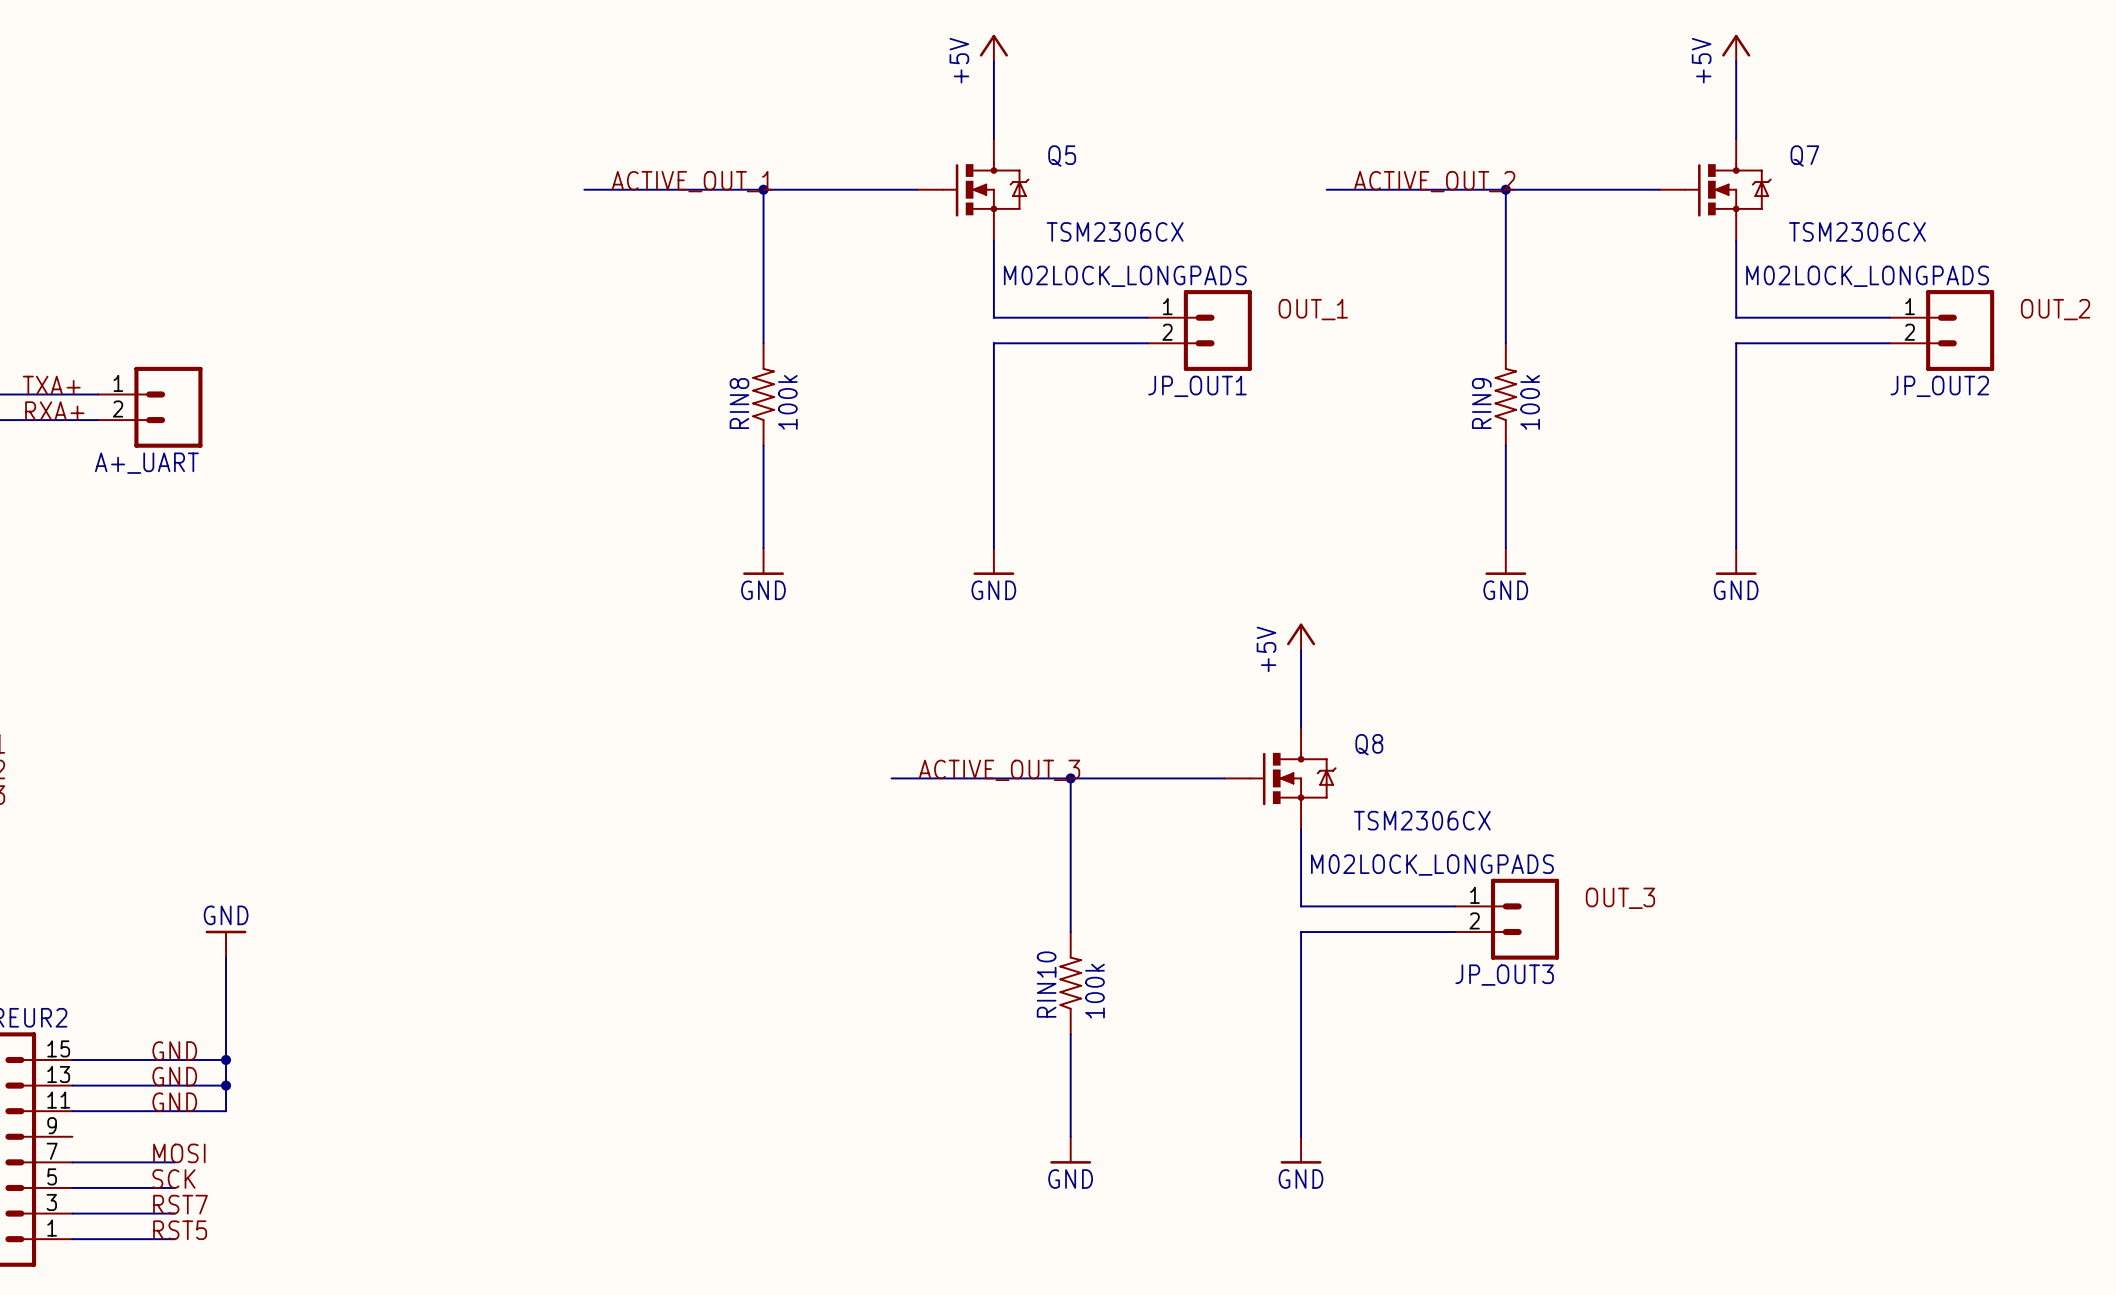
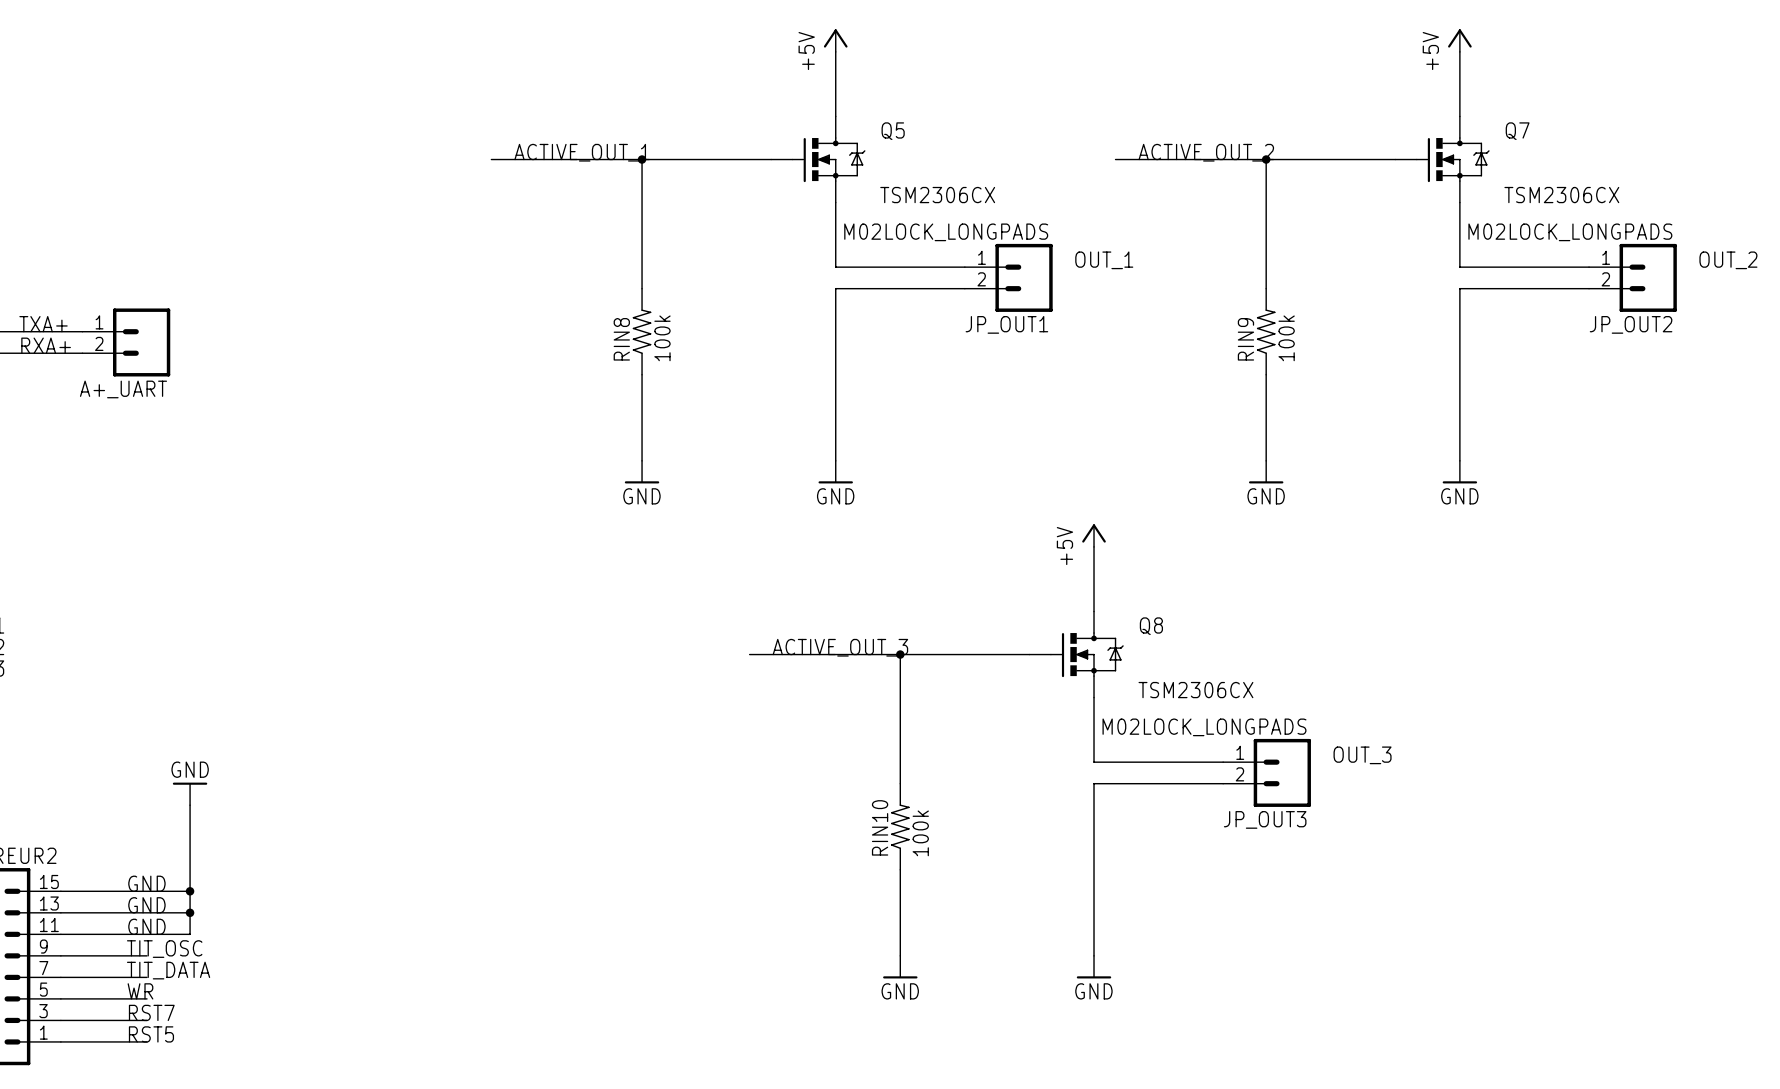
label: none -> TIT_OSC (164, 949)
wire: none -> (60, 955) (147, 955)
label: MOSI (179, 1153) -> TIT_DATA (168, 970)
label: SCK (173, 1179) -> WR (140, 991)

